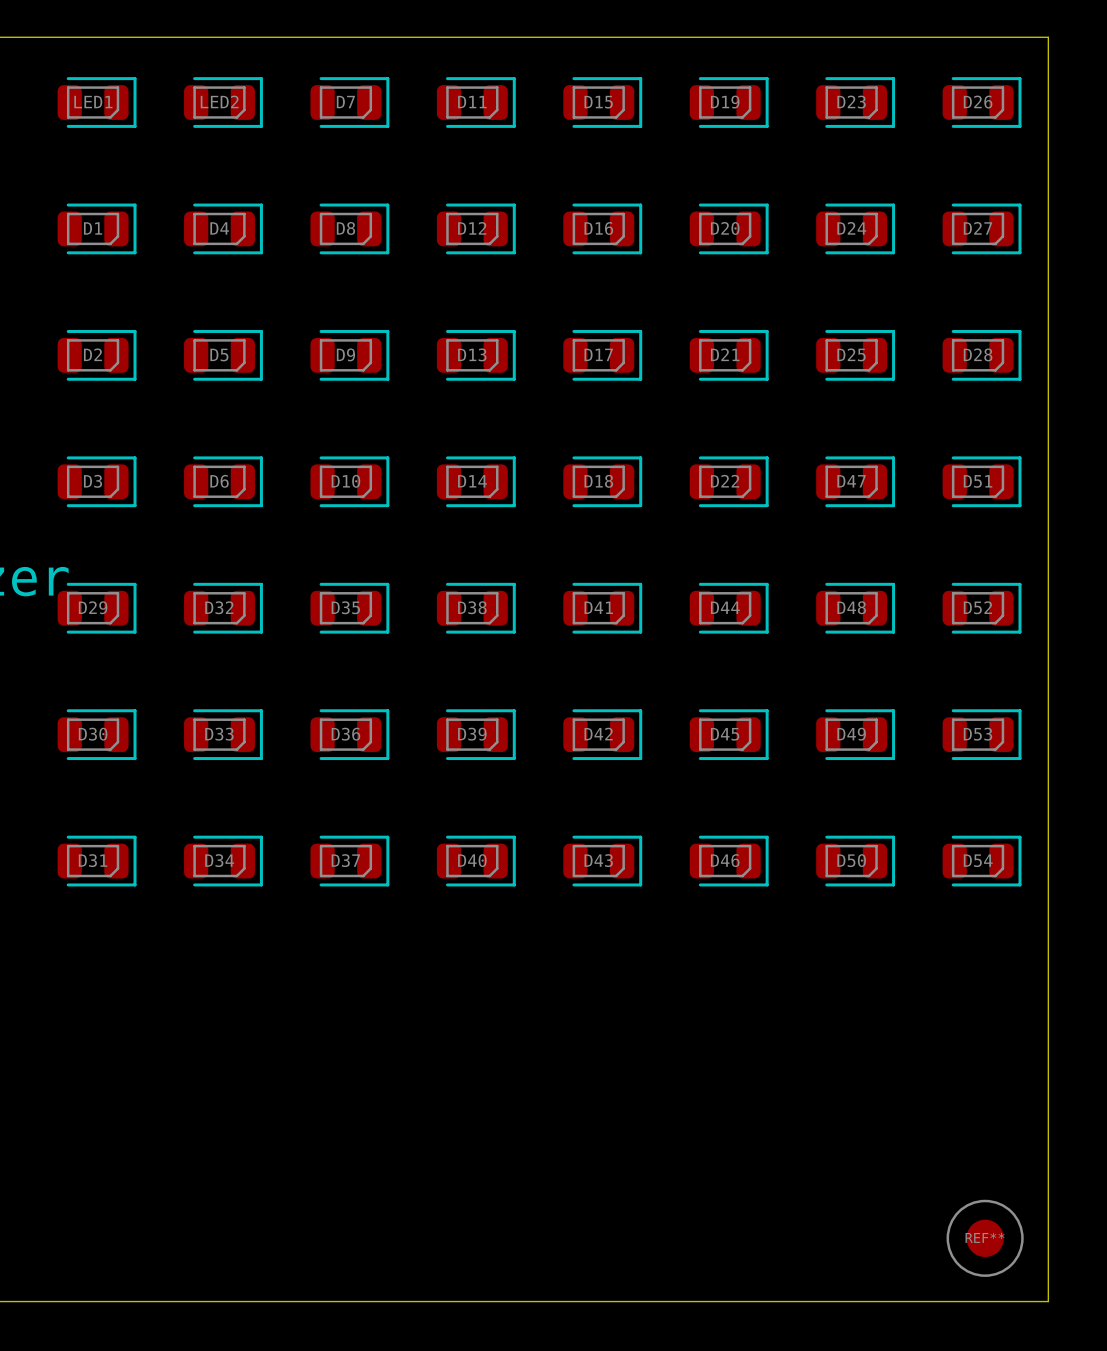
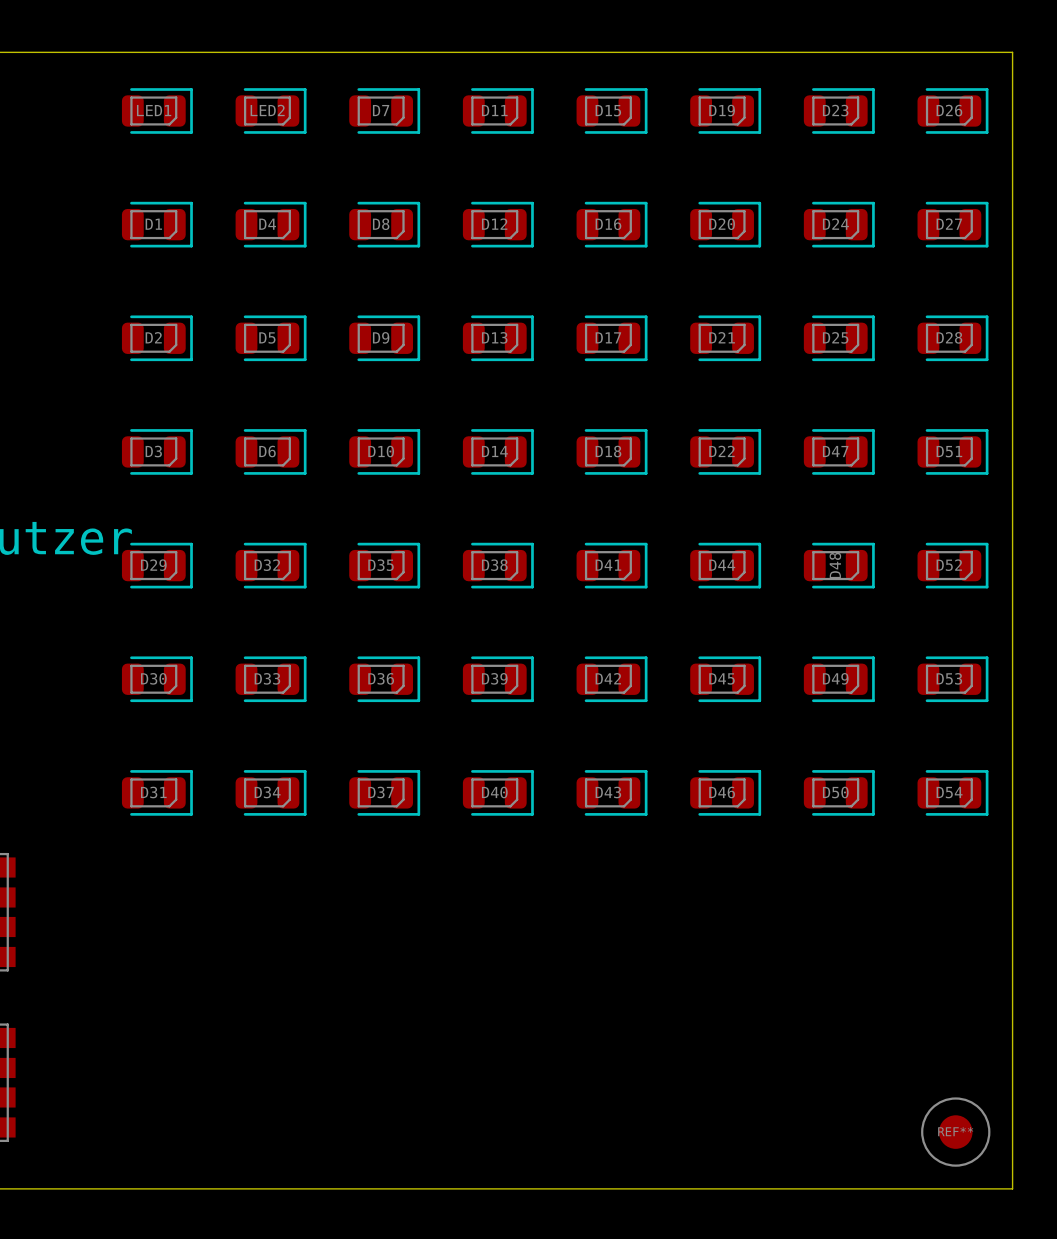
D48 name rotation: 0° (851, 607) -> 90° counterclockwise (835, 565)

